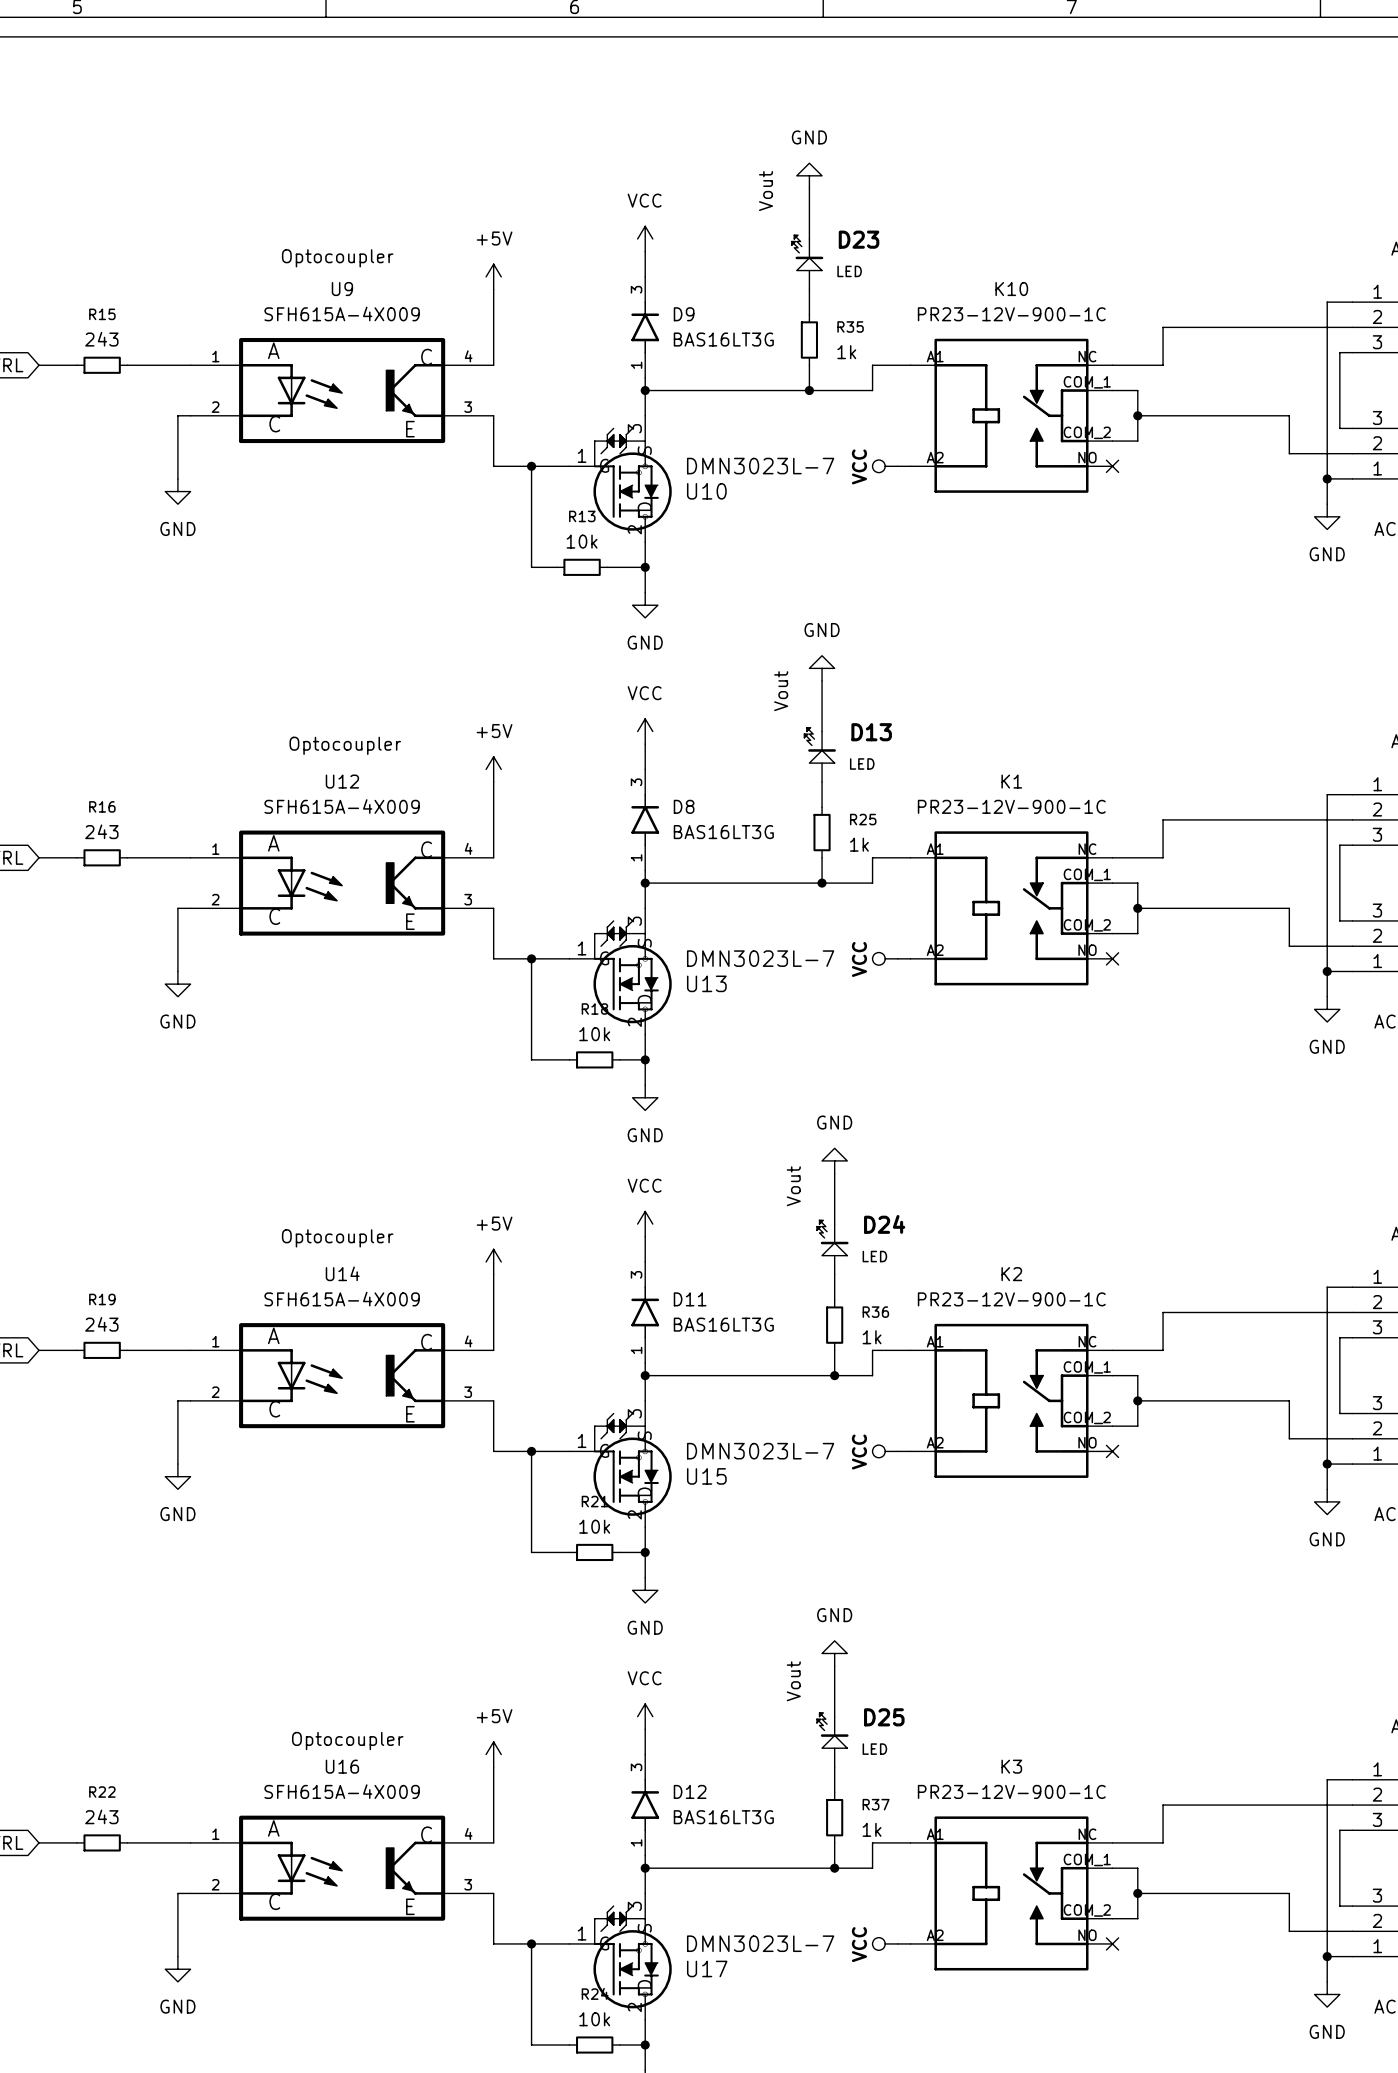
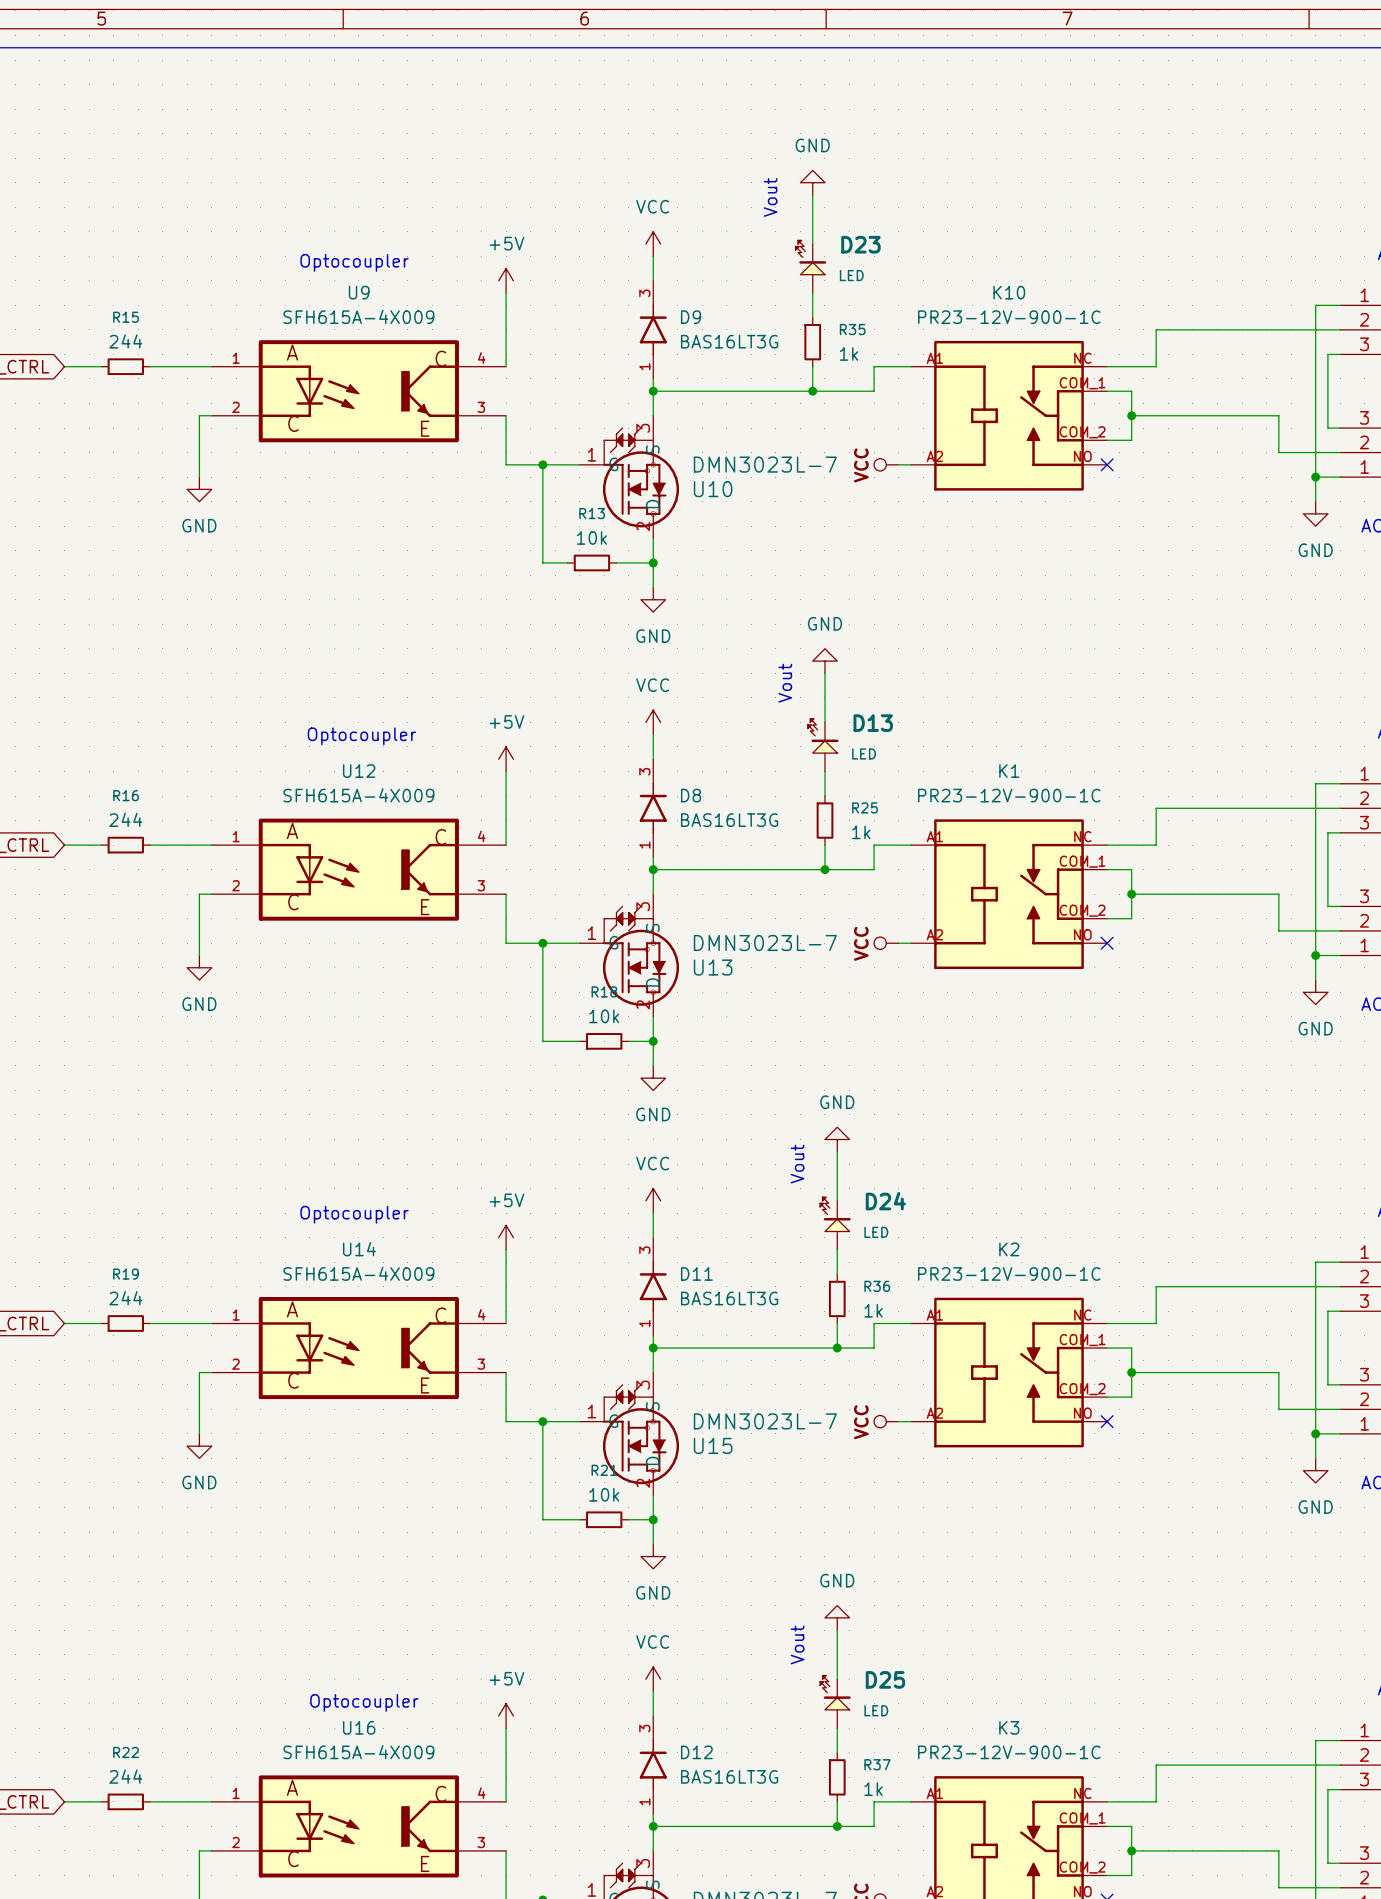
R15 value: 243 (101, 339) -> 244 (125, 341)
R16 value: 243 (101, 831) -> 244 (125, 819)
R19 value: 243 (101, 1324) -> 244 (125, 1298)
R22 value: 243 (101, 1816) -> 244 (125, 1776)

